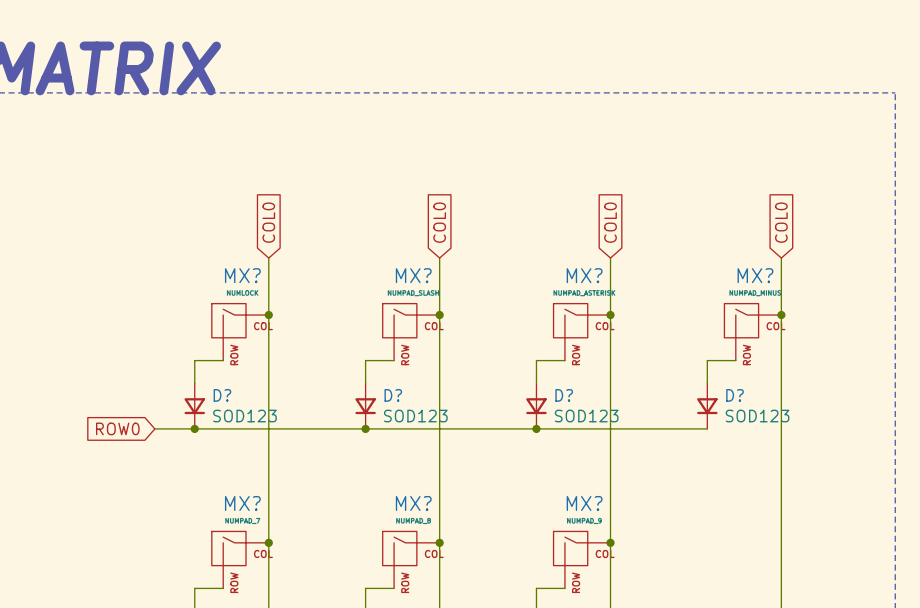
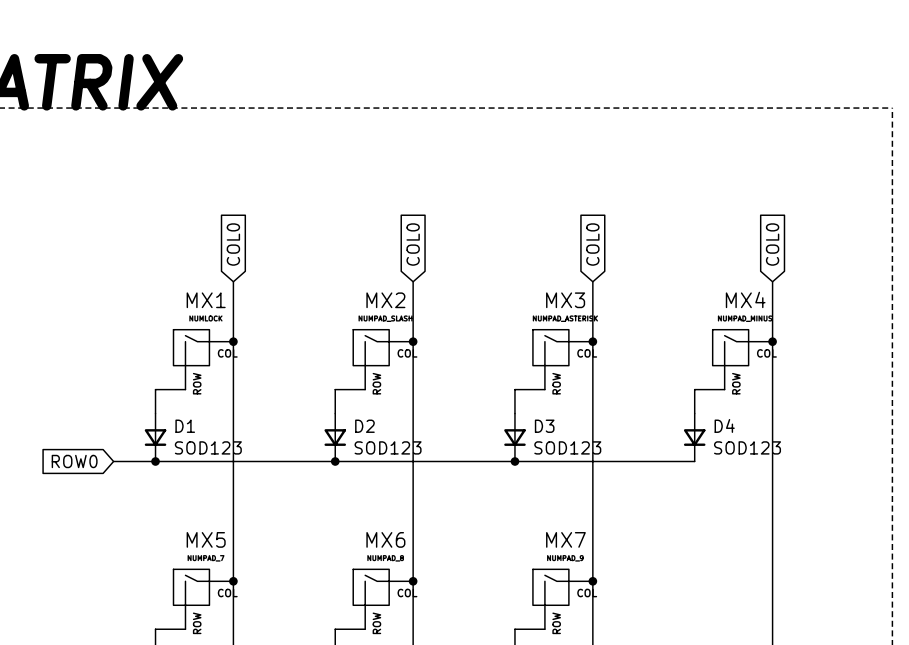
MX? name: MX? (242, 275) -> MX1 (206, 300)
MX? name: MX? (413, 275) -> MX2 (385, 300)
MX? name: MX? (584, 275) -> MX3 (565, 300)
MX? name: MX? (755, 275) -> MX4 (745, 299)
D? name: D? (222, 395) -> D1 (185, 426)
D? name: D? (393, 395) -> D2 (364, 426)
D? name: D? (564, 395) -> D3 (544, 426)
D? name: D? (735, 395) -> D4 (724, 425)
MX? name: MX? (242, 503) -> MX5 (206, 539)
MX? name: MX? (413, 503) -> MX6 (385, 539)
MX? name: MX? (584, 503) -> MX7 (565, 539)

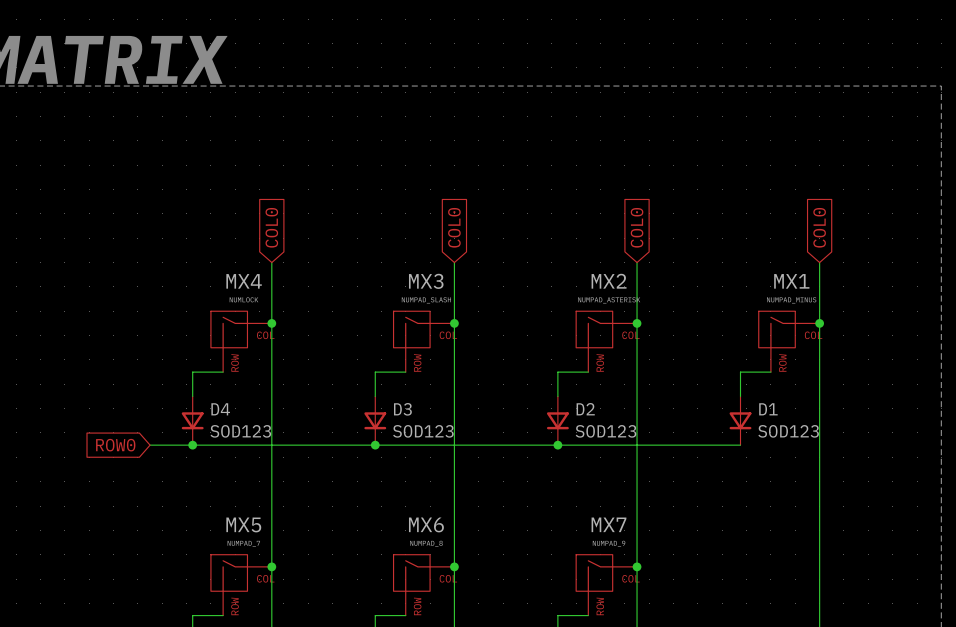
MX4 name: MX4 (745, 299) -> MX1 (791, 281)
MX1 name: MX1 (206, 300) -> MX4 (244, 281)
MX2 name: MX2 (385, 300) -> MX3 (426, 281)
MX3 name: MX3 (565, 300) -> MX2 (609, 281)
D4 name: D4 (724, 425) -> D1 (768, 409)
D1 name: D1 (185, 426) -> D4 (220, 409)
D2 name: D2 (364, 426) -> D3 (402, 409)
D3 name: D3 (544, 426) -> D2 (585, 409)

